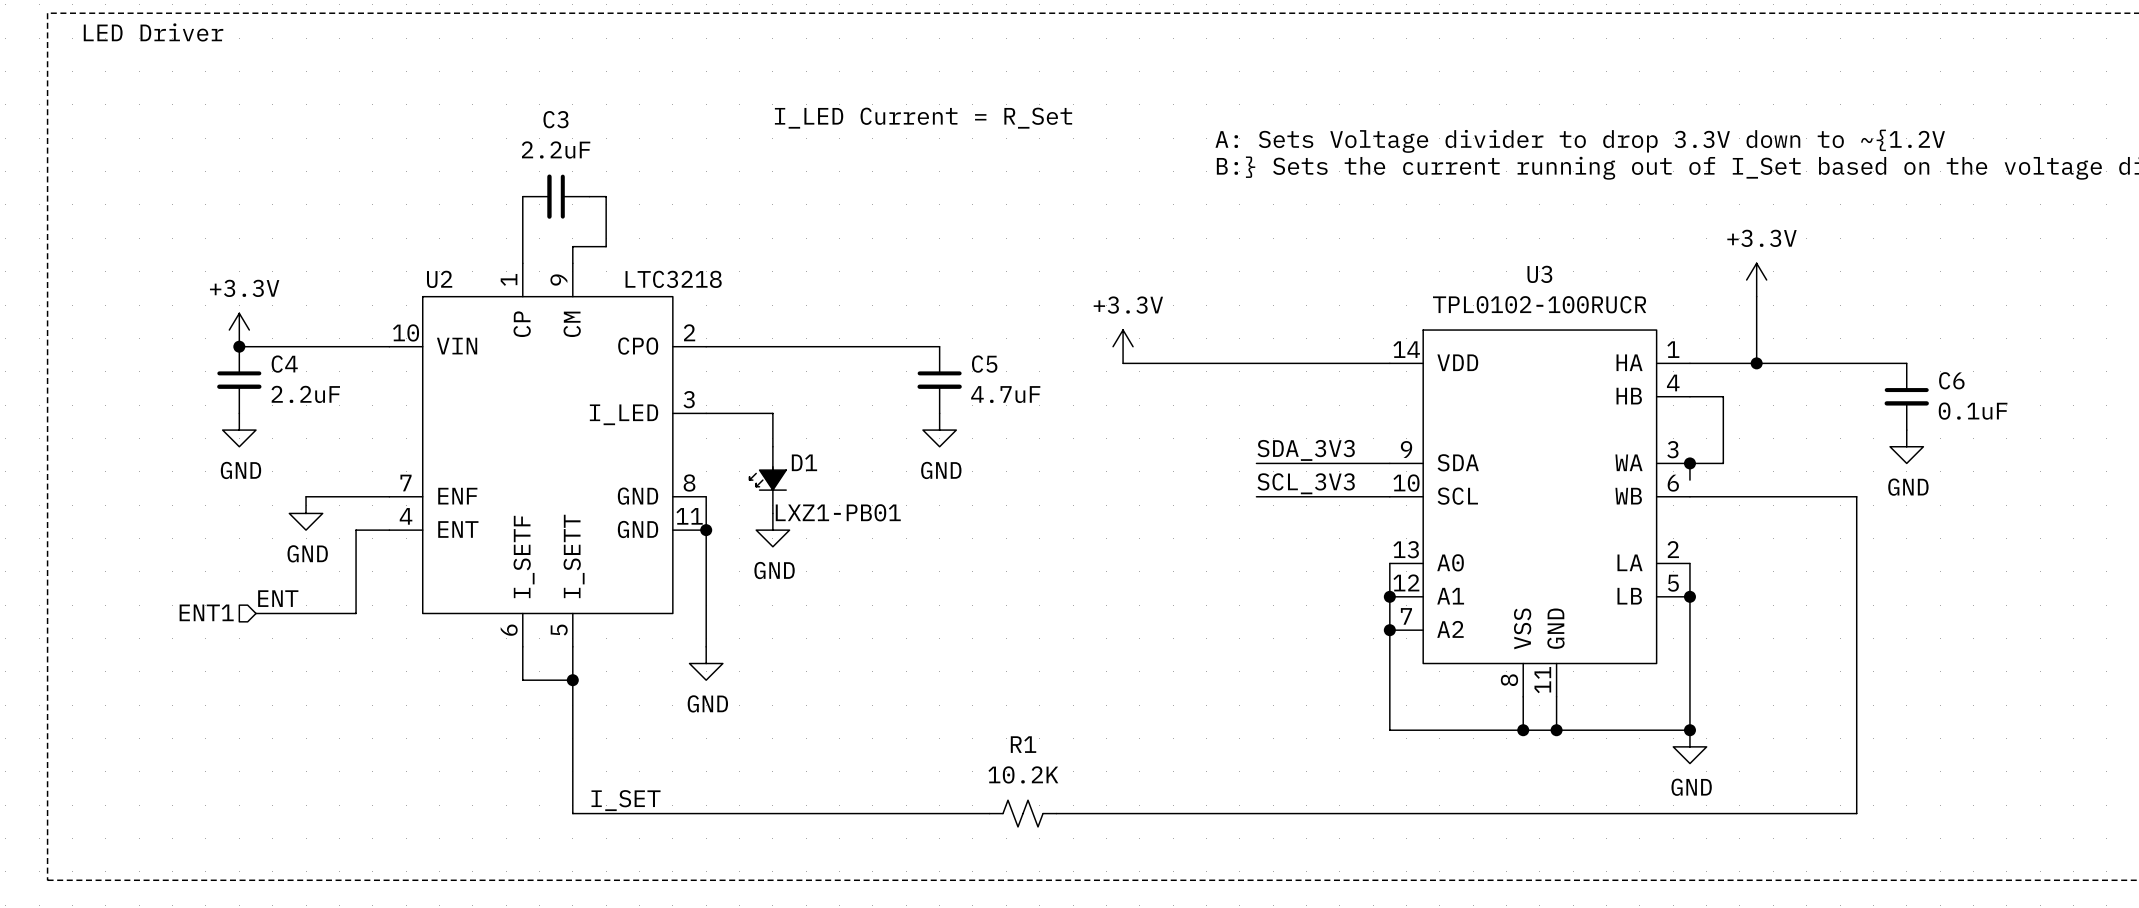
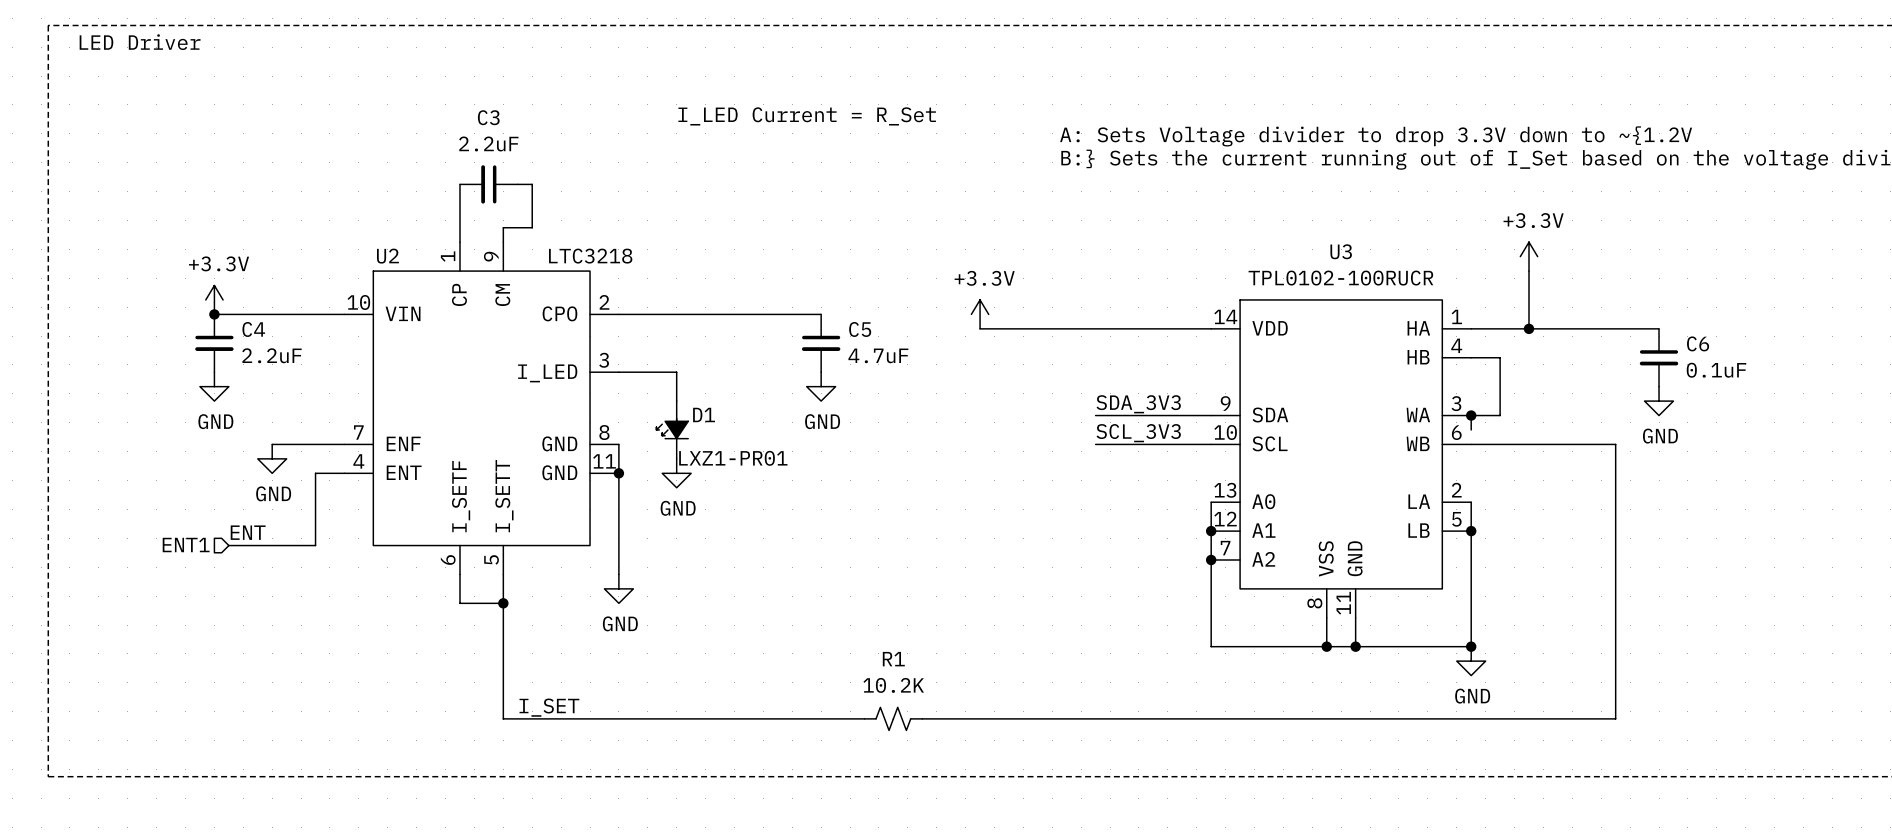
D1 value: LXZ1-PB01 (838, 512) -> LXZ1-PR01 (733, 458)

